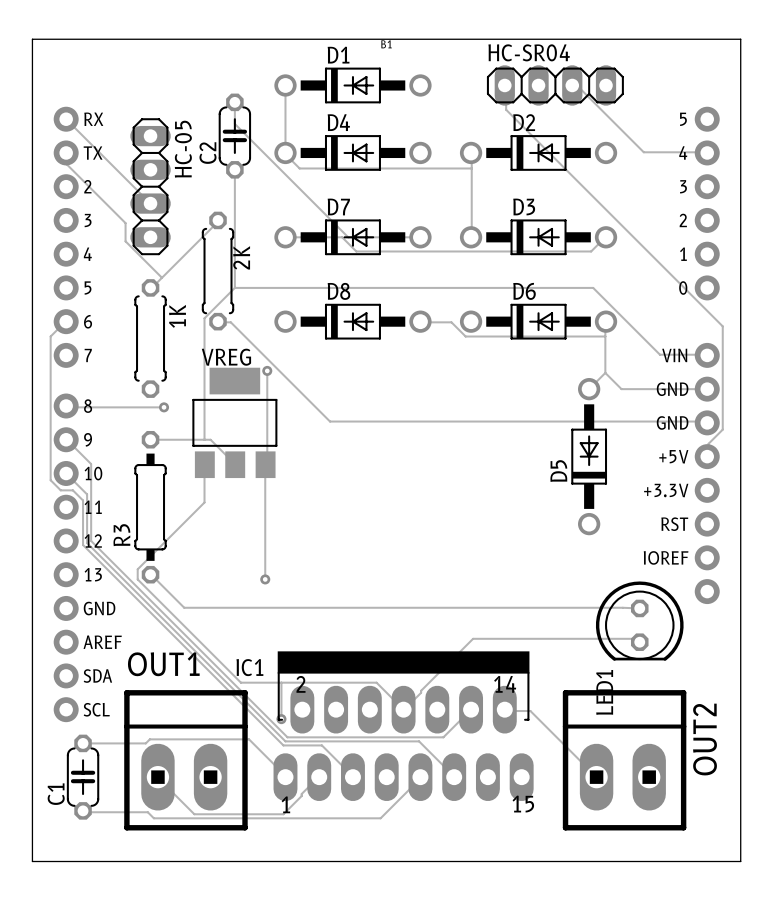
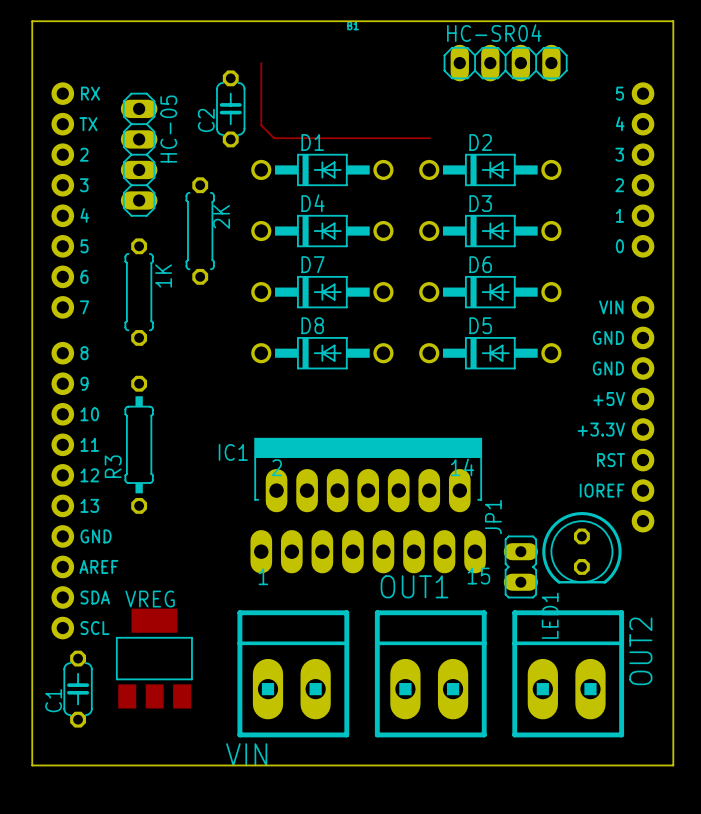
D1 position: (352, 85) -> (322, 169)
track: (504, 85) (506, 109) (722, 326) (722, 429) (708, 443) (707, 456) -> none
track: (572, 85) (577, 85) (643, 152) (707, 152) -> none
track: (234, 102) (234, 123) (348, 237) (420, 237) -> none
track: (66, 119) (150, 203) -> none
C2 position: (234, 136) -> (230, 108)
track: (66, 152) (66, 164) (125, 223) (125, 241) (162, 277) -> none
D4 position: (352, 152) -> (322, 231)
track: (471, 152) (471, 237) -> none
D2 position: (538, 152) -> (490, 169)
track: (234, 169) (234, 287) -> none
track: (218, 220) (150, 287) -> none
track: (285, 237) (342, 237) (356, 251) (591, 251) (606, 237) -> none
D7 position: (352, 237) -> (322, 292)
D3 position: (538, 237) -> (490, 231)
track: (234, 287) (593, 287) (660, 354) (707, 355) -> none
track: (234, 287) (204, 318) (204, 439) -> none
track: (66, 321) (50, 336) (50, 480) (60, 490) (72, 490) (83, 500) (83, 545) (283, 745) (321, 745) (352, 777) -> none
track: (218, 321) (230, 322) (330, 421) (707, 422) -> none
D8 position: (352, 321) -> (322, 353)
track: (420, 321) (451, 322) (465, 336) (605, 336) -> none
D6 position: (538, 321) -> (490, 292)
track: (606, 321) (605, 372) -> none
track: (267, 370) (265, 579) -> none
via: (267, 370) -> none
track: (605, 372) (589, 389) -> none
track: (605, 372) (621, 389) (707, 389) -> none
track: (66, 406) (164, 407) -> none
via: (164, 407) -> none
VREG position: (234, 422) -> (154, 658)
track: (66, 439) (91, 464) (91, 540) (287, 737) (443, 737) (471, 709) -> none
track: (150, 439) (210, 439) (235, 464) -> none
D5 rotation: 0° (589, 456) -> 90° clockwise (490, 353)
track: (204, 464) (204, 502) (137, 569) (137, 579) (240, 682) (376, 682) (403, 709) (473, 638) (636, 638) (639, 642) -> none
track: (66, 473) (87, 494) (87, 542) (285, 741) (419, 741) (454, 777) -> none
track: (150, 574) (184, 607) (639, 608) -> none
via: (265, 579) -> none
JP1: none -> (520, 566)
track: (281, 682) (281, 719) -> none
track: (504, 709) (530, 711) (596, 777) -> none
via: (281, 719) -> none
IC1 position: (403, 726) -> (368, 505)
track: (83, 743) (145, 743) (149, 739) (249, 739) (285, 777) -> none
OUT1 position: (185, 760) -> (430, 673)
VIN: none -> (293, 673)
track: (157, 777) (194, 814) (283, 814) (319, 777) -> none
track: (420, 777) (380, 818) (153, 818) (147, 812) (83, 810) -> none

